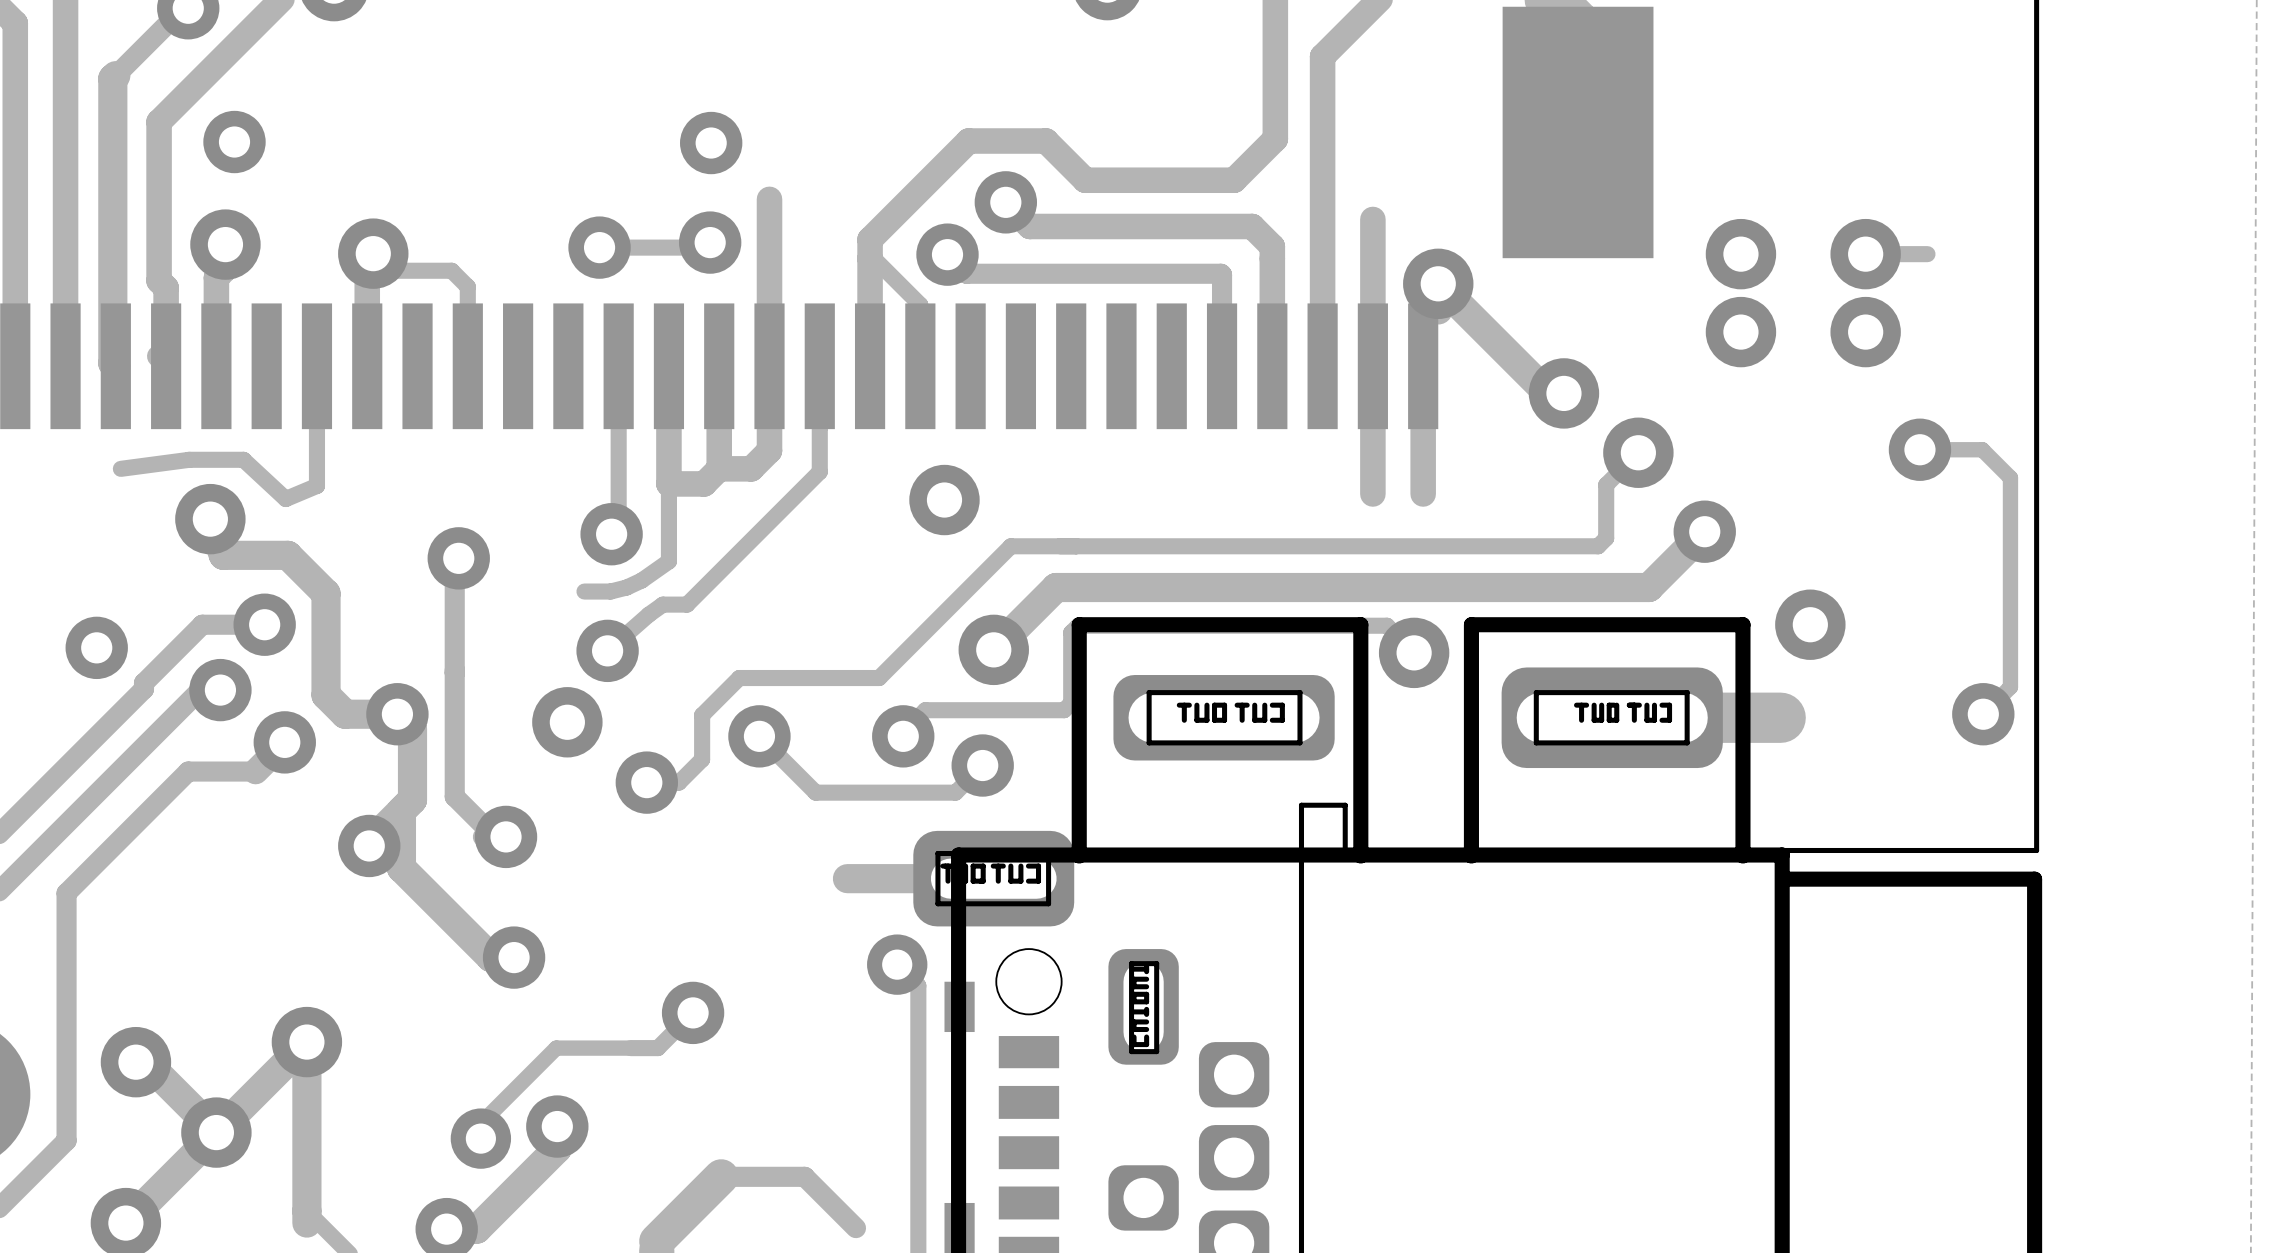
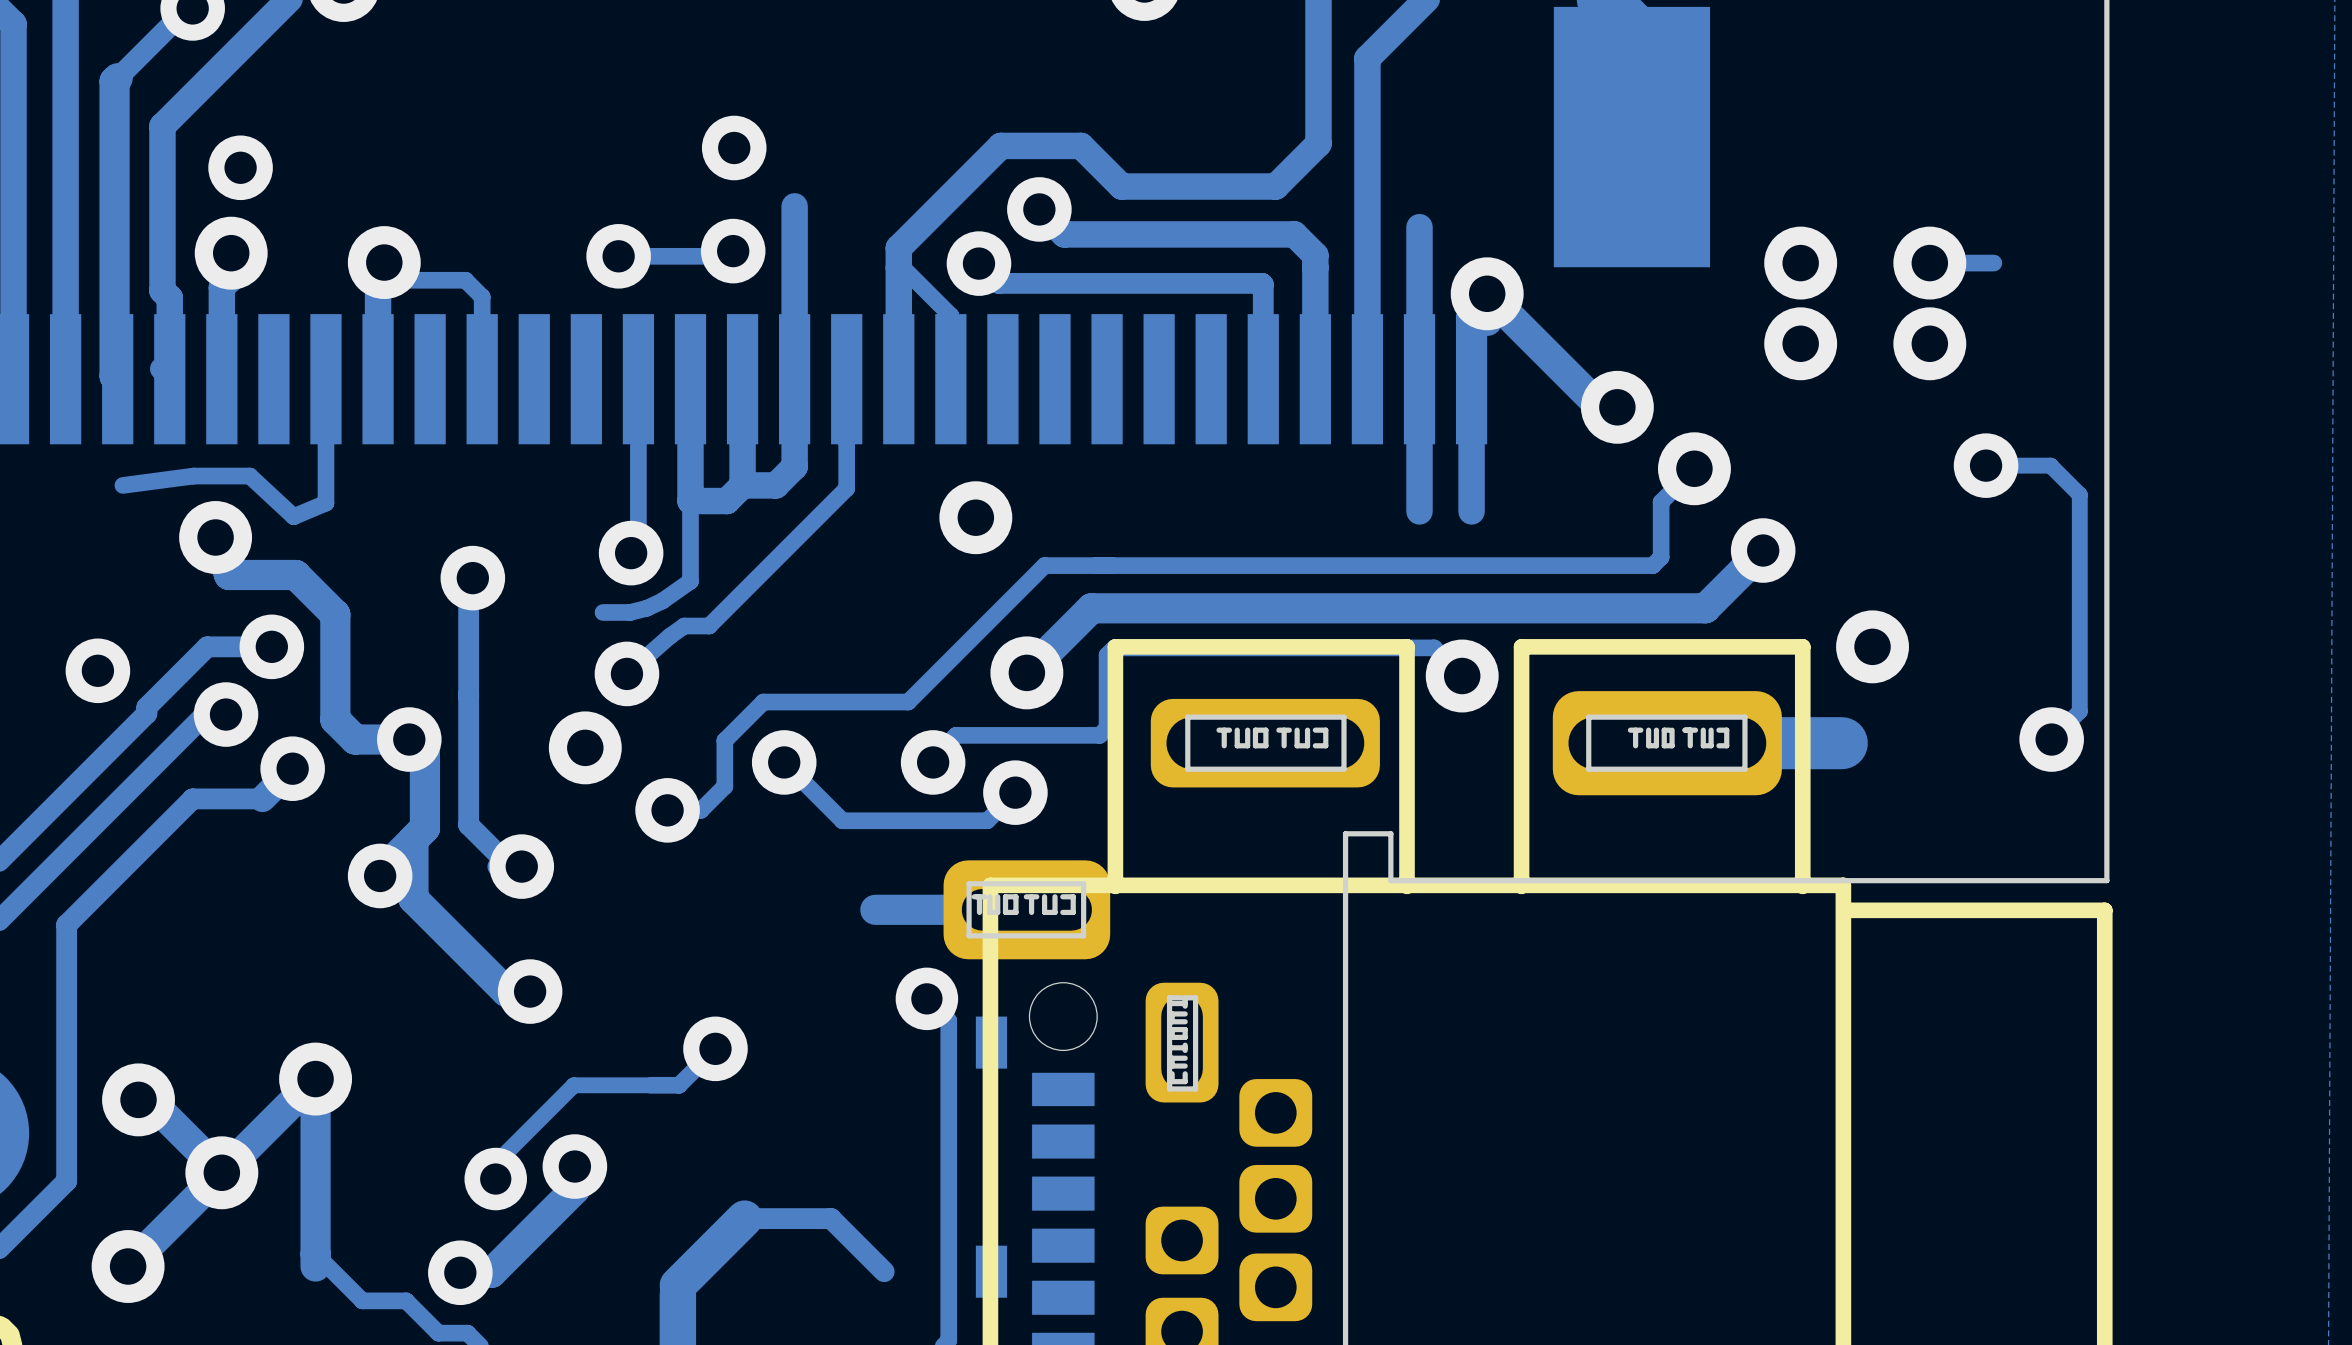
via position: (234, 142) -> (240, 167)

